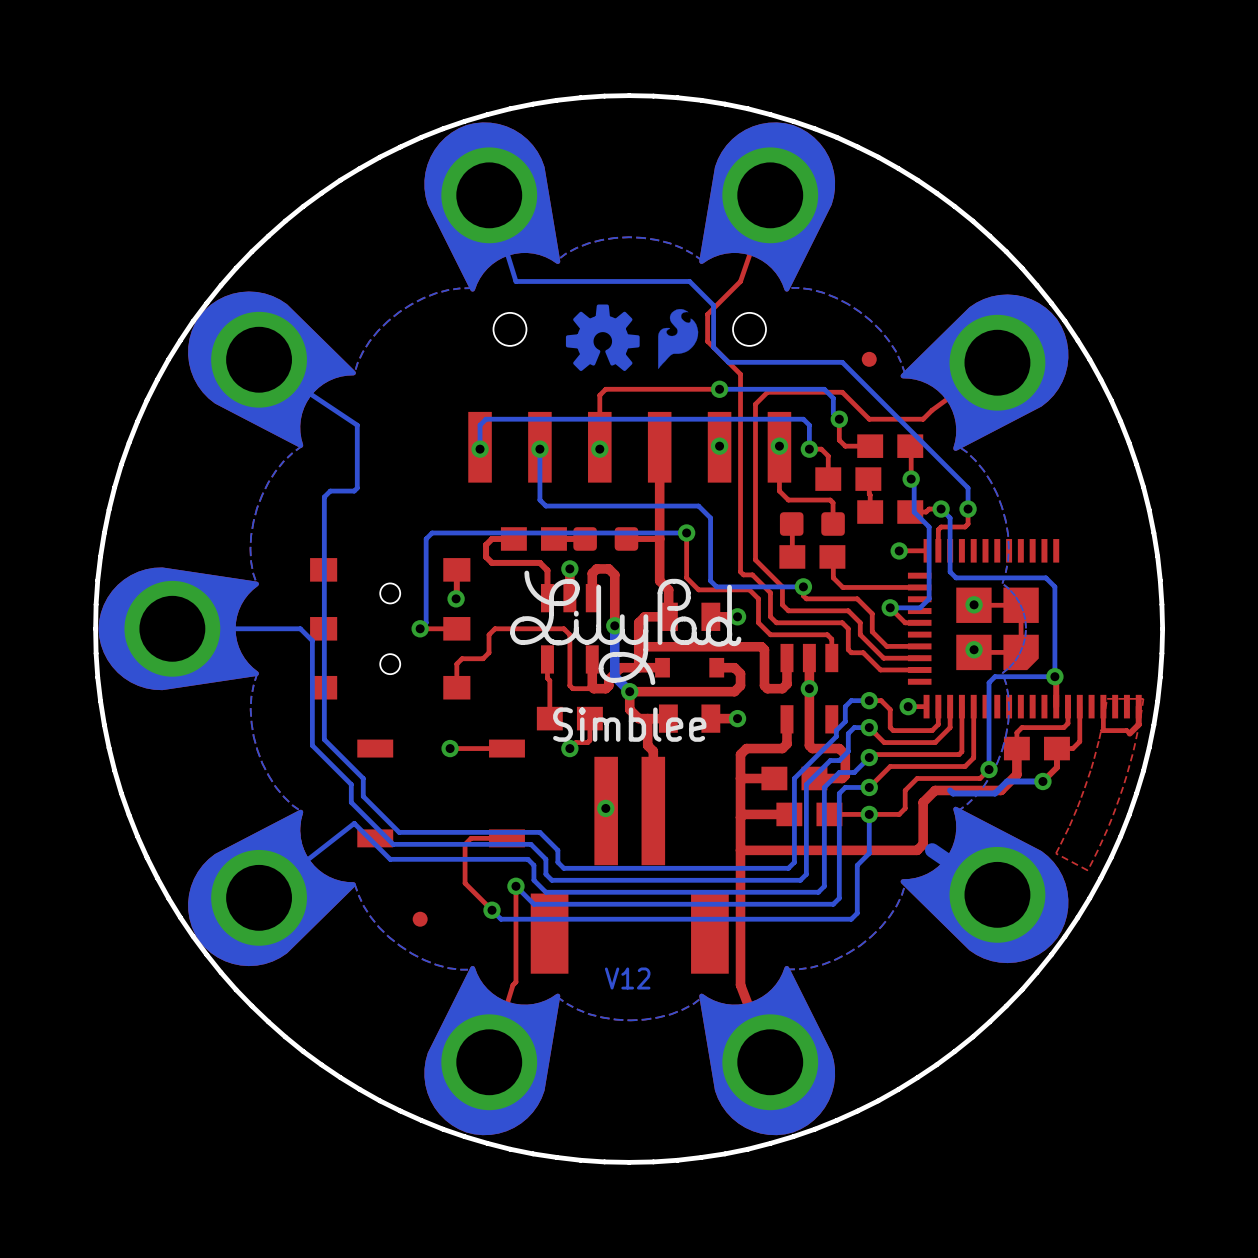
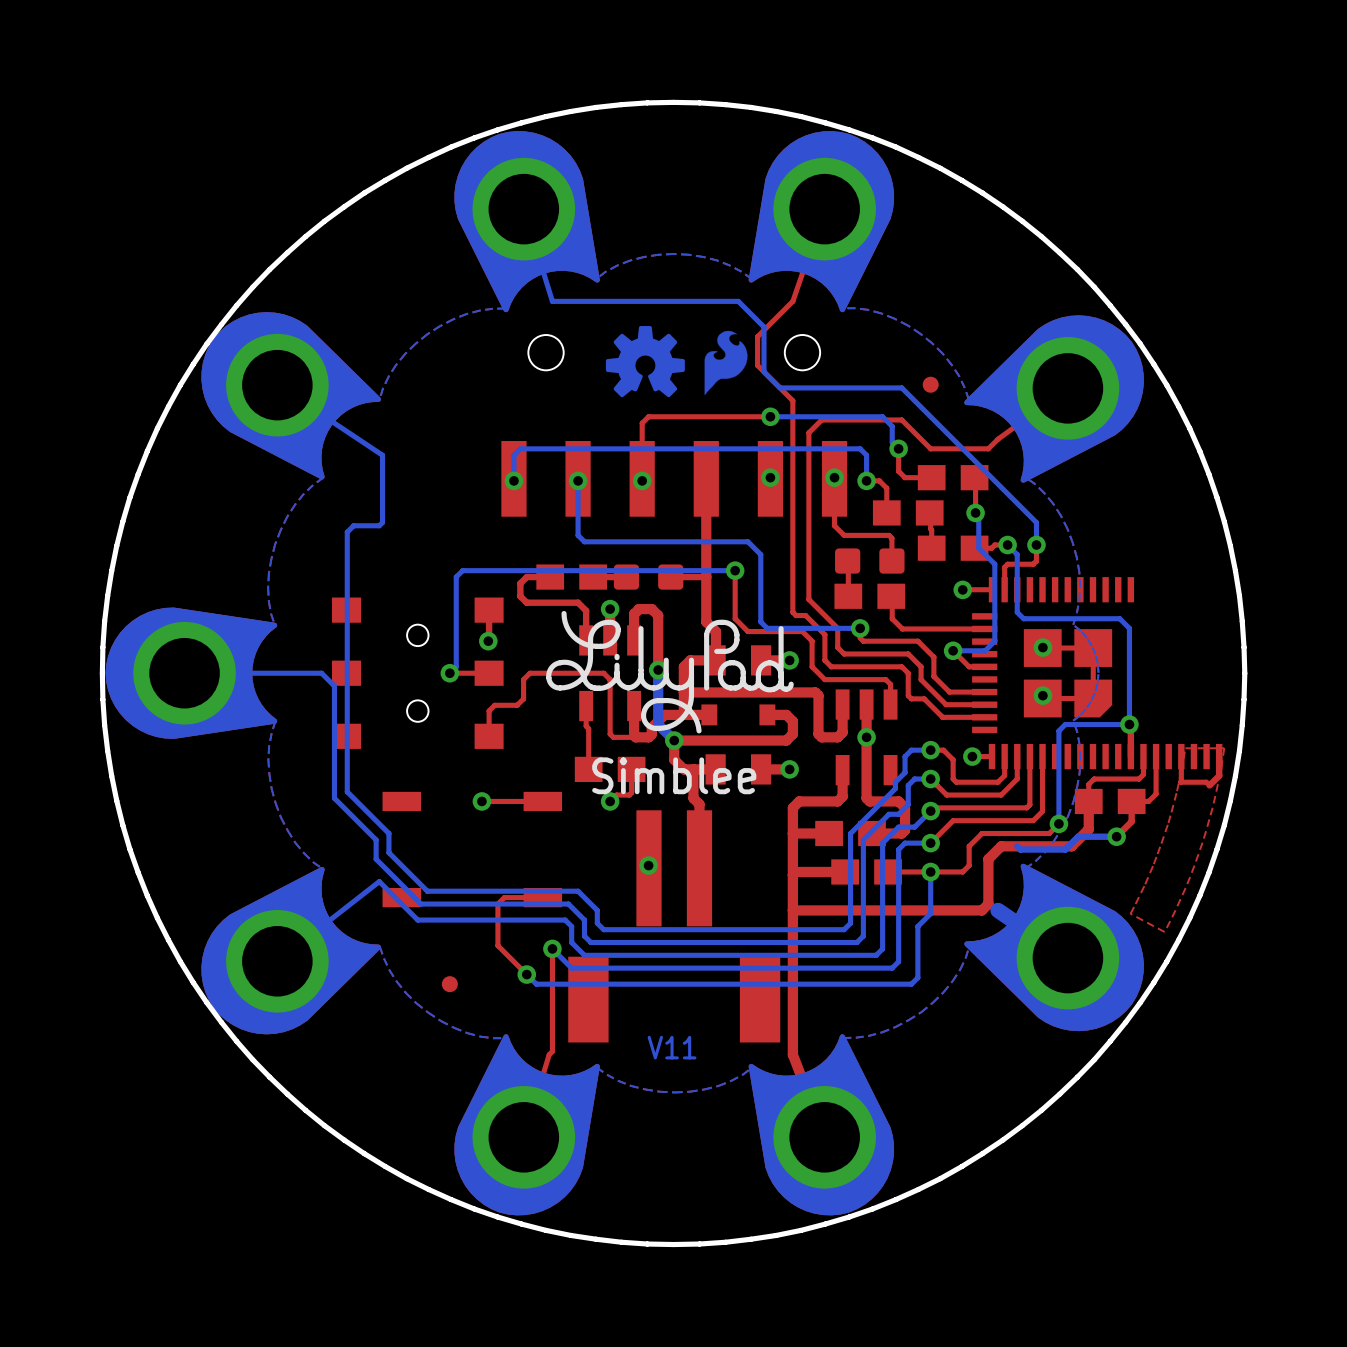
text: V12 (627, 978) -> V11 (672, 1047)

